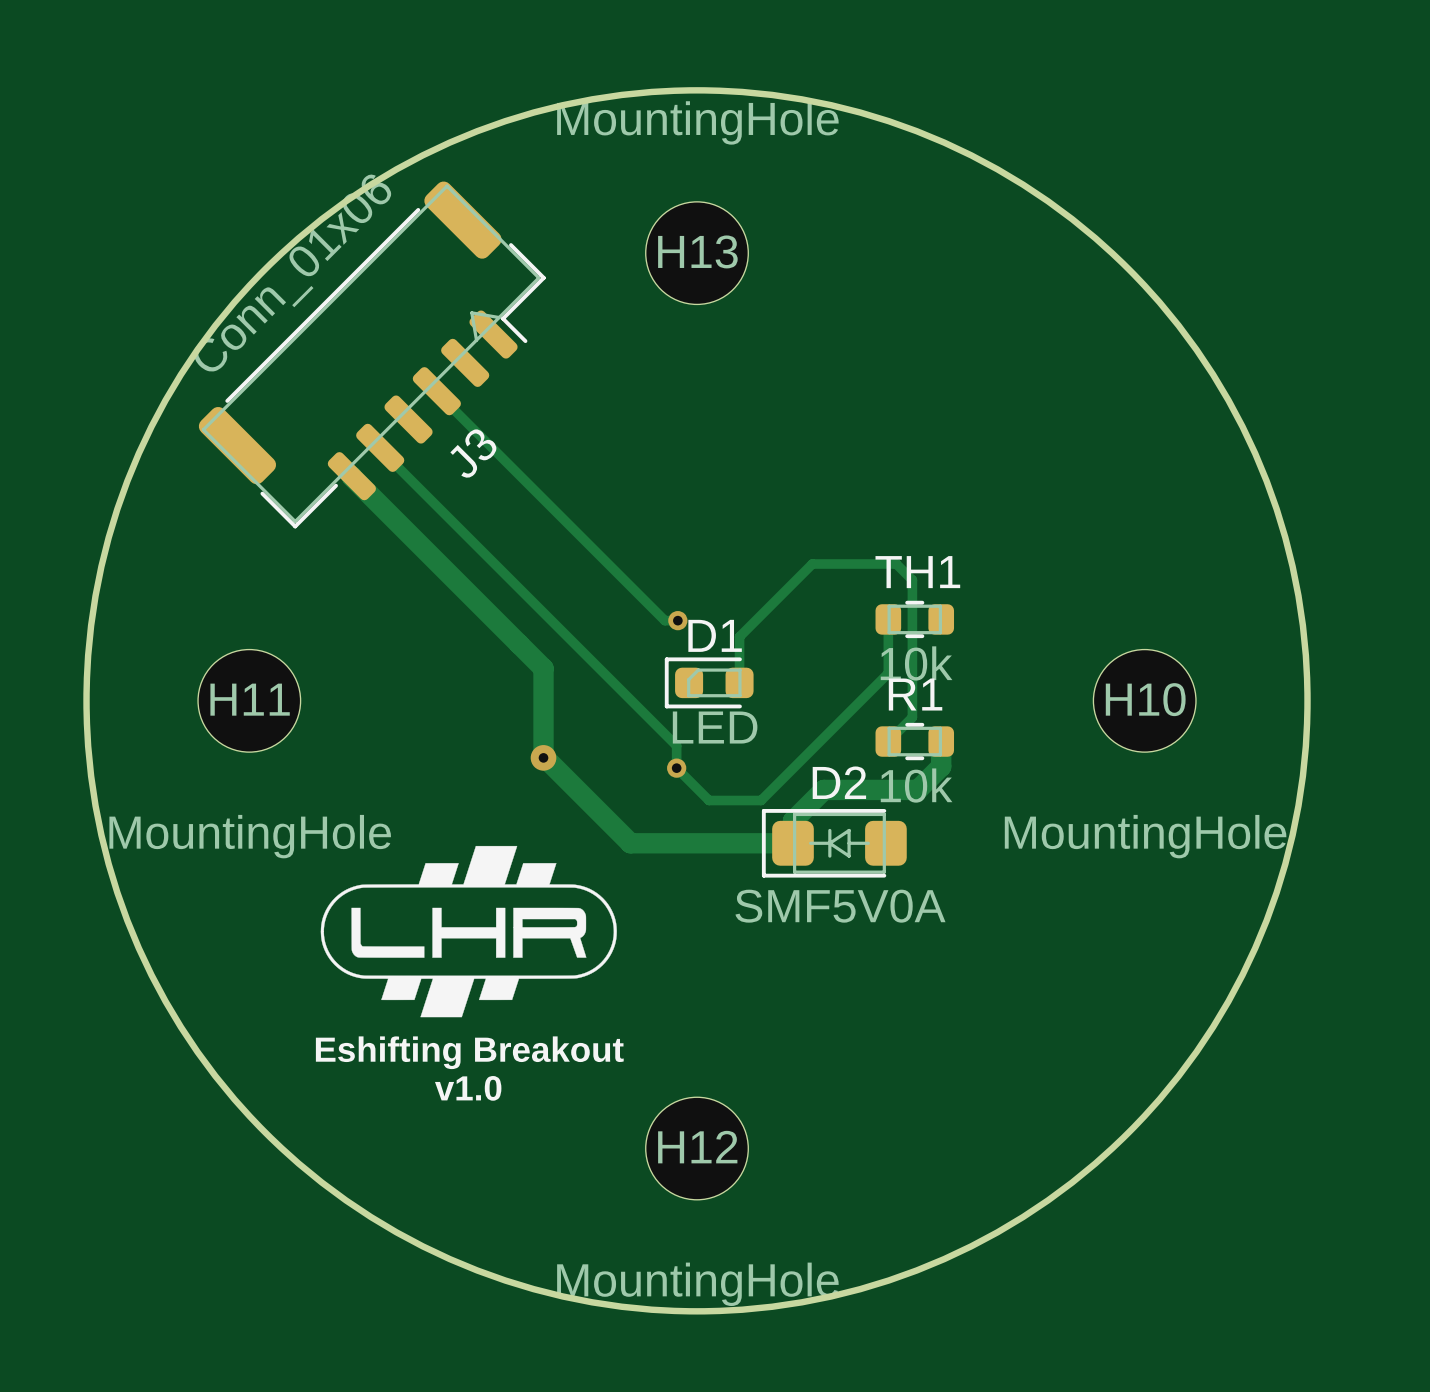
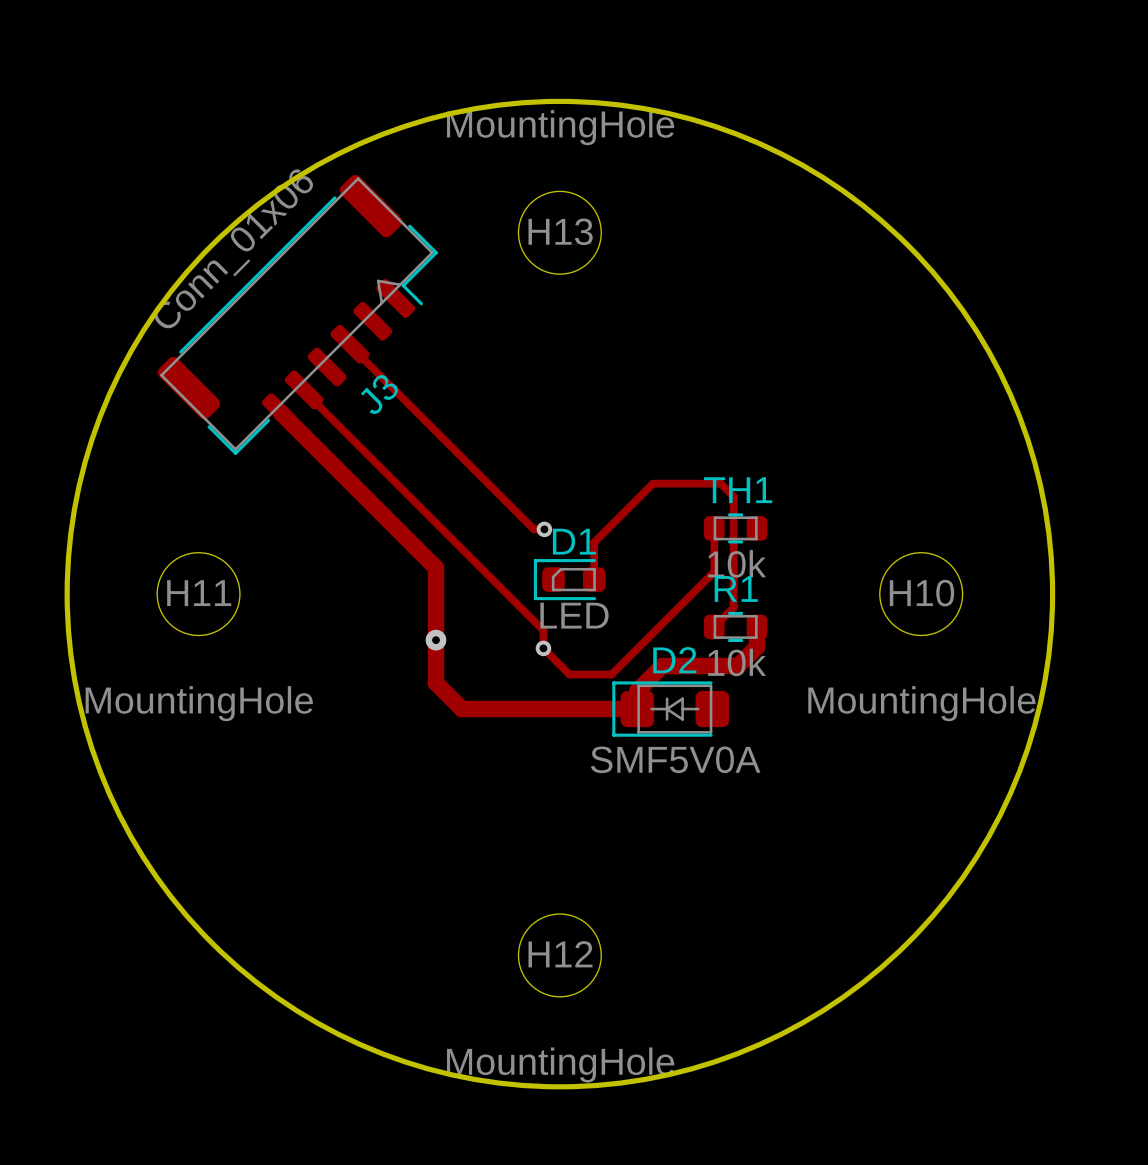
track: (543, 757) (630, 843) -> (435, 640) (435, 683) (461, 709) (506, 709)
drawing: [320, 845, 617, 1018] -> none
text: Eshifting Breakout (469, 1052) -> none
text: v1.0 (468, 1088) -> none

